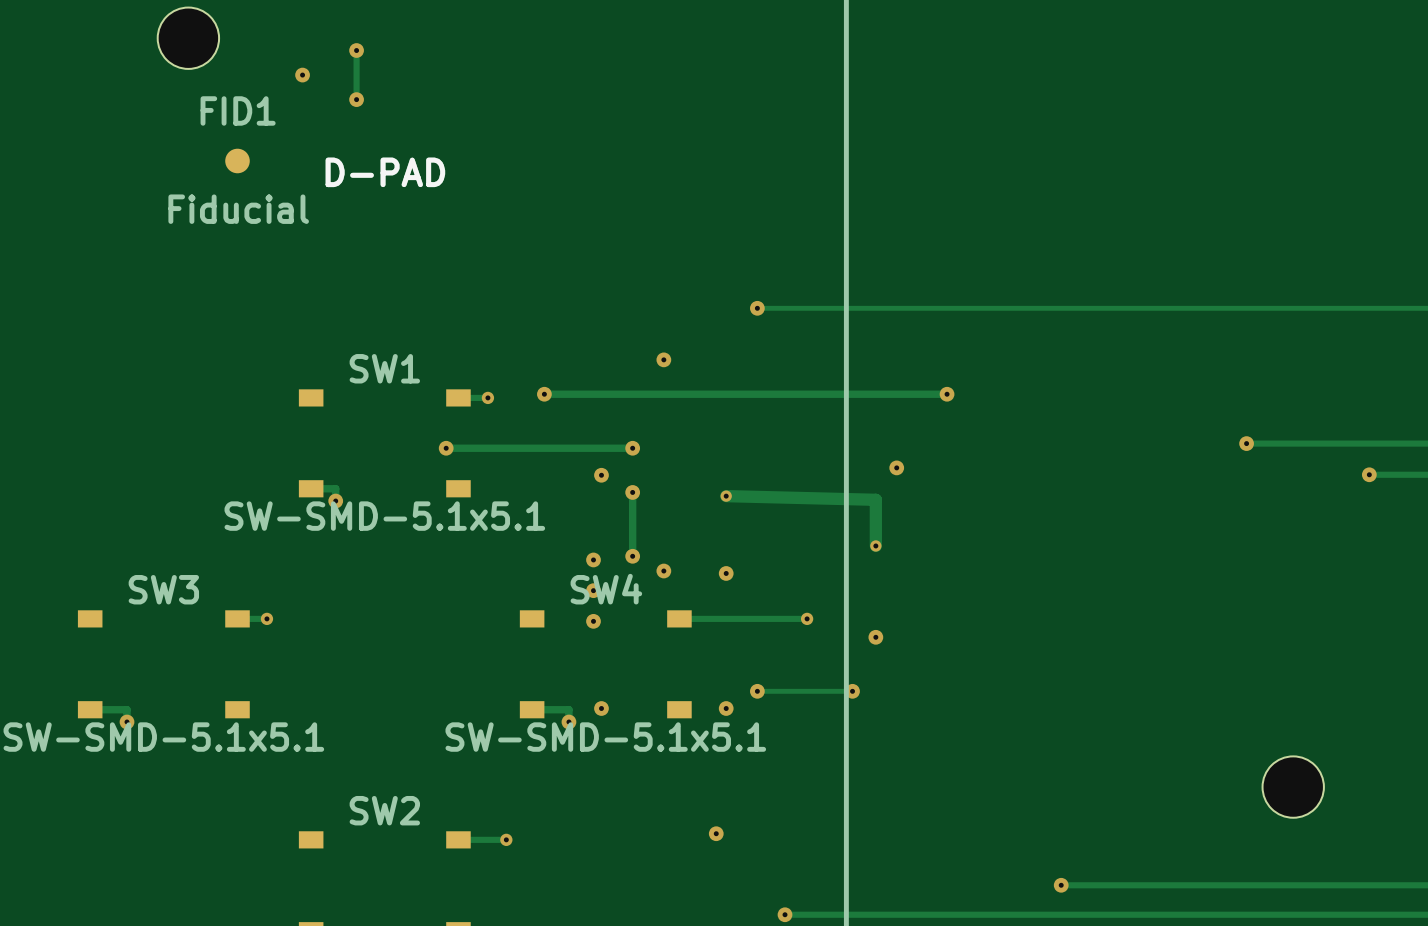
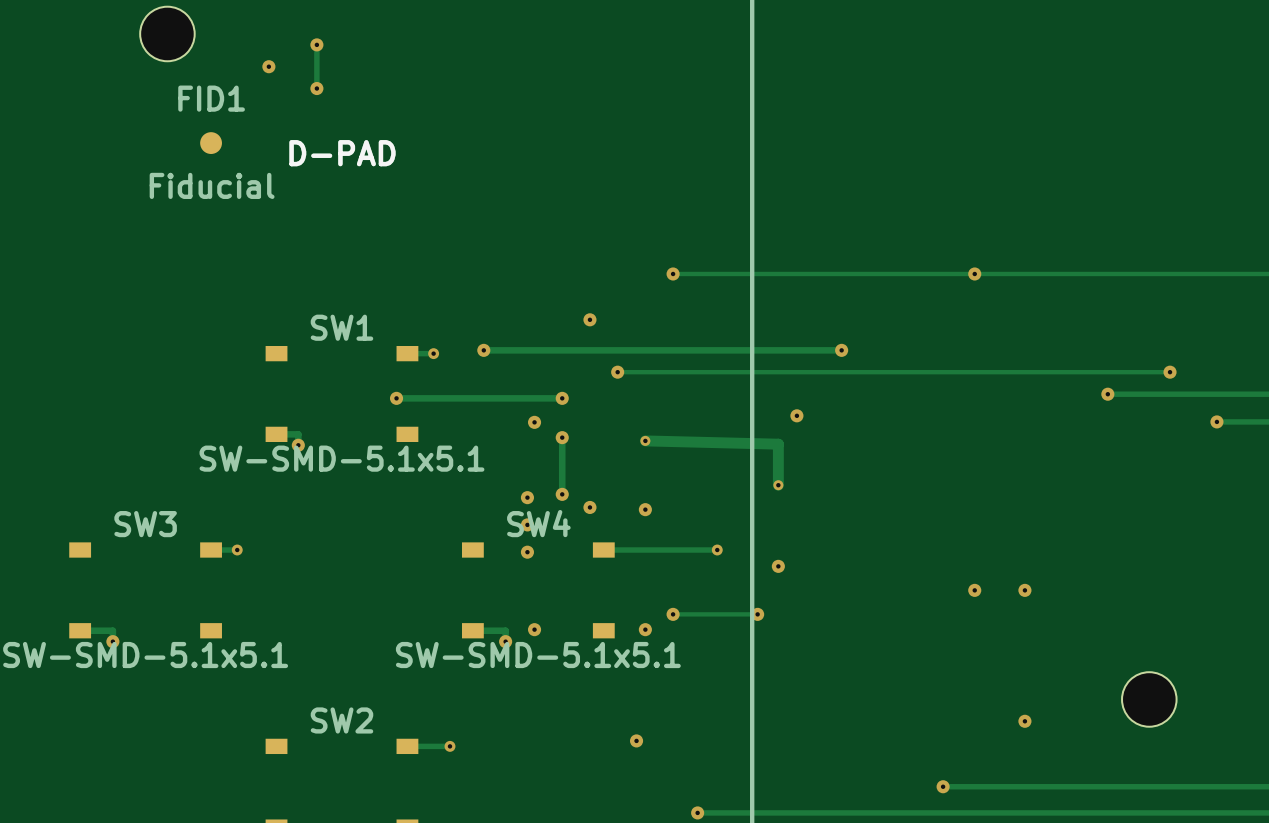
via: none -> (974, 273)
track: none -> (617, 372) (1170, 372)
via: none -> (617, 372)
via: none -> (1170, 372)
via: none -> (974, 590)
via: none -> (1024, 590)
via: none -> (1024, 721)

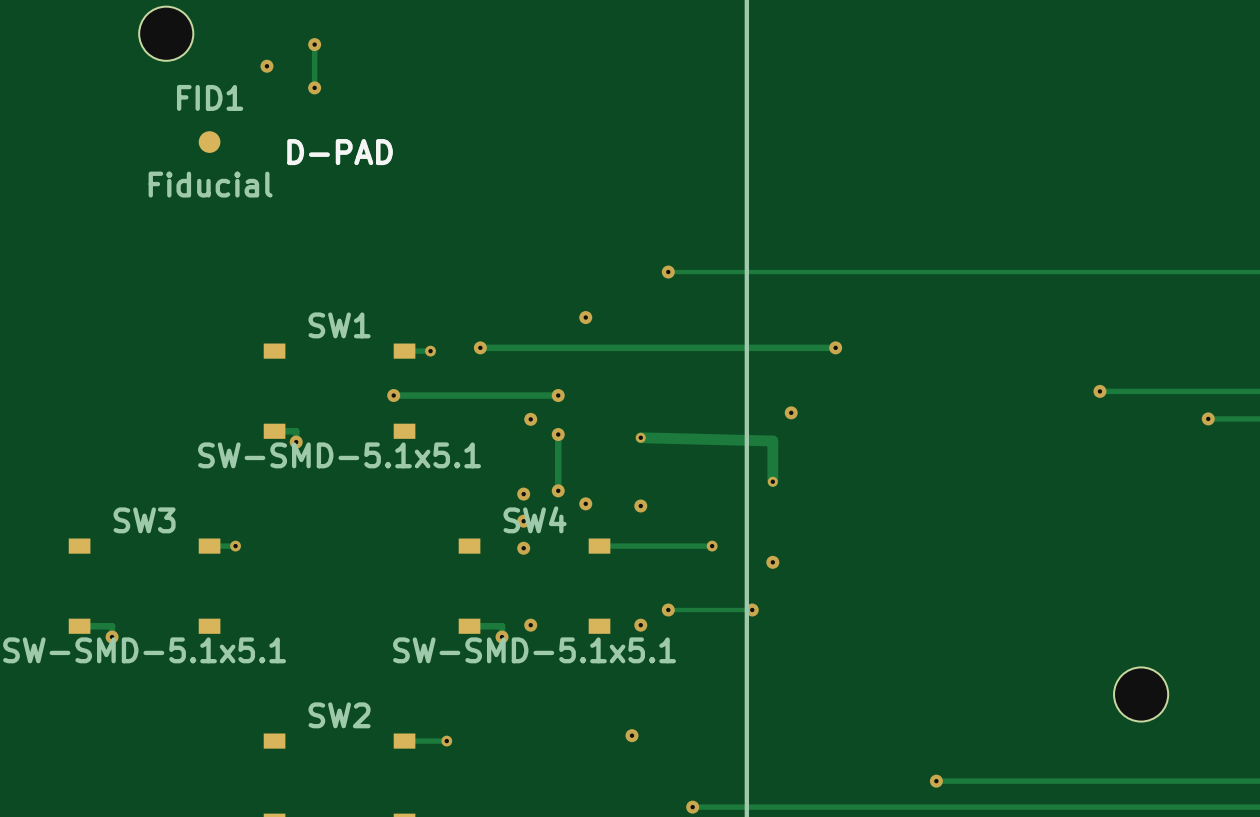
via: (974, 273) -> none
track: (617, 372) (1170, 372) -> none
via: (617, 372) -> none
via: (1170, 372) -> none
via: (974, 590) -> none
via: (1024, 590) -> none
via: (1024, 721) -> none

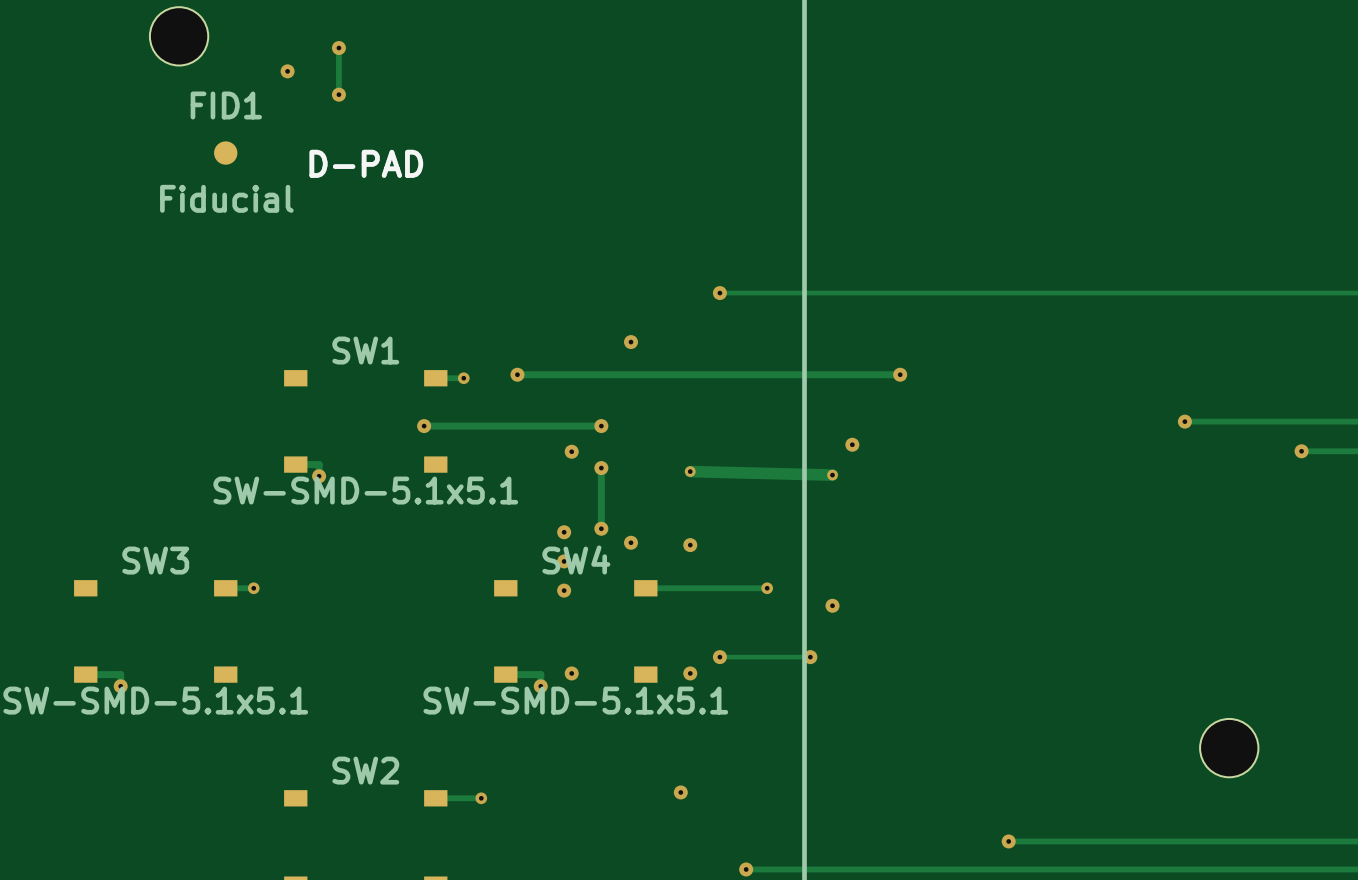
track: (772, 441) (772, 481) -> none
via position: (772, 481) -> (832, 475)

